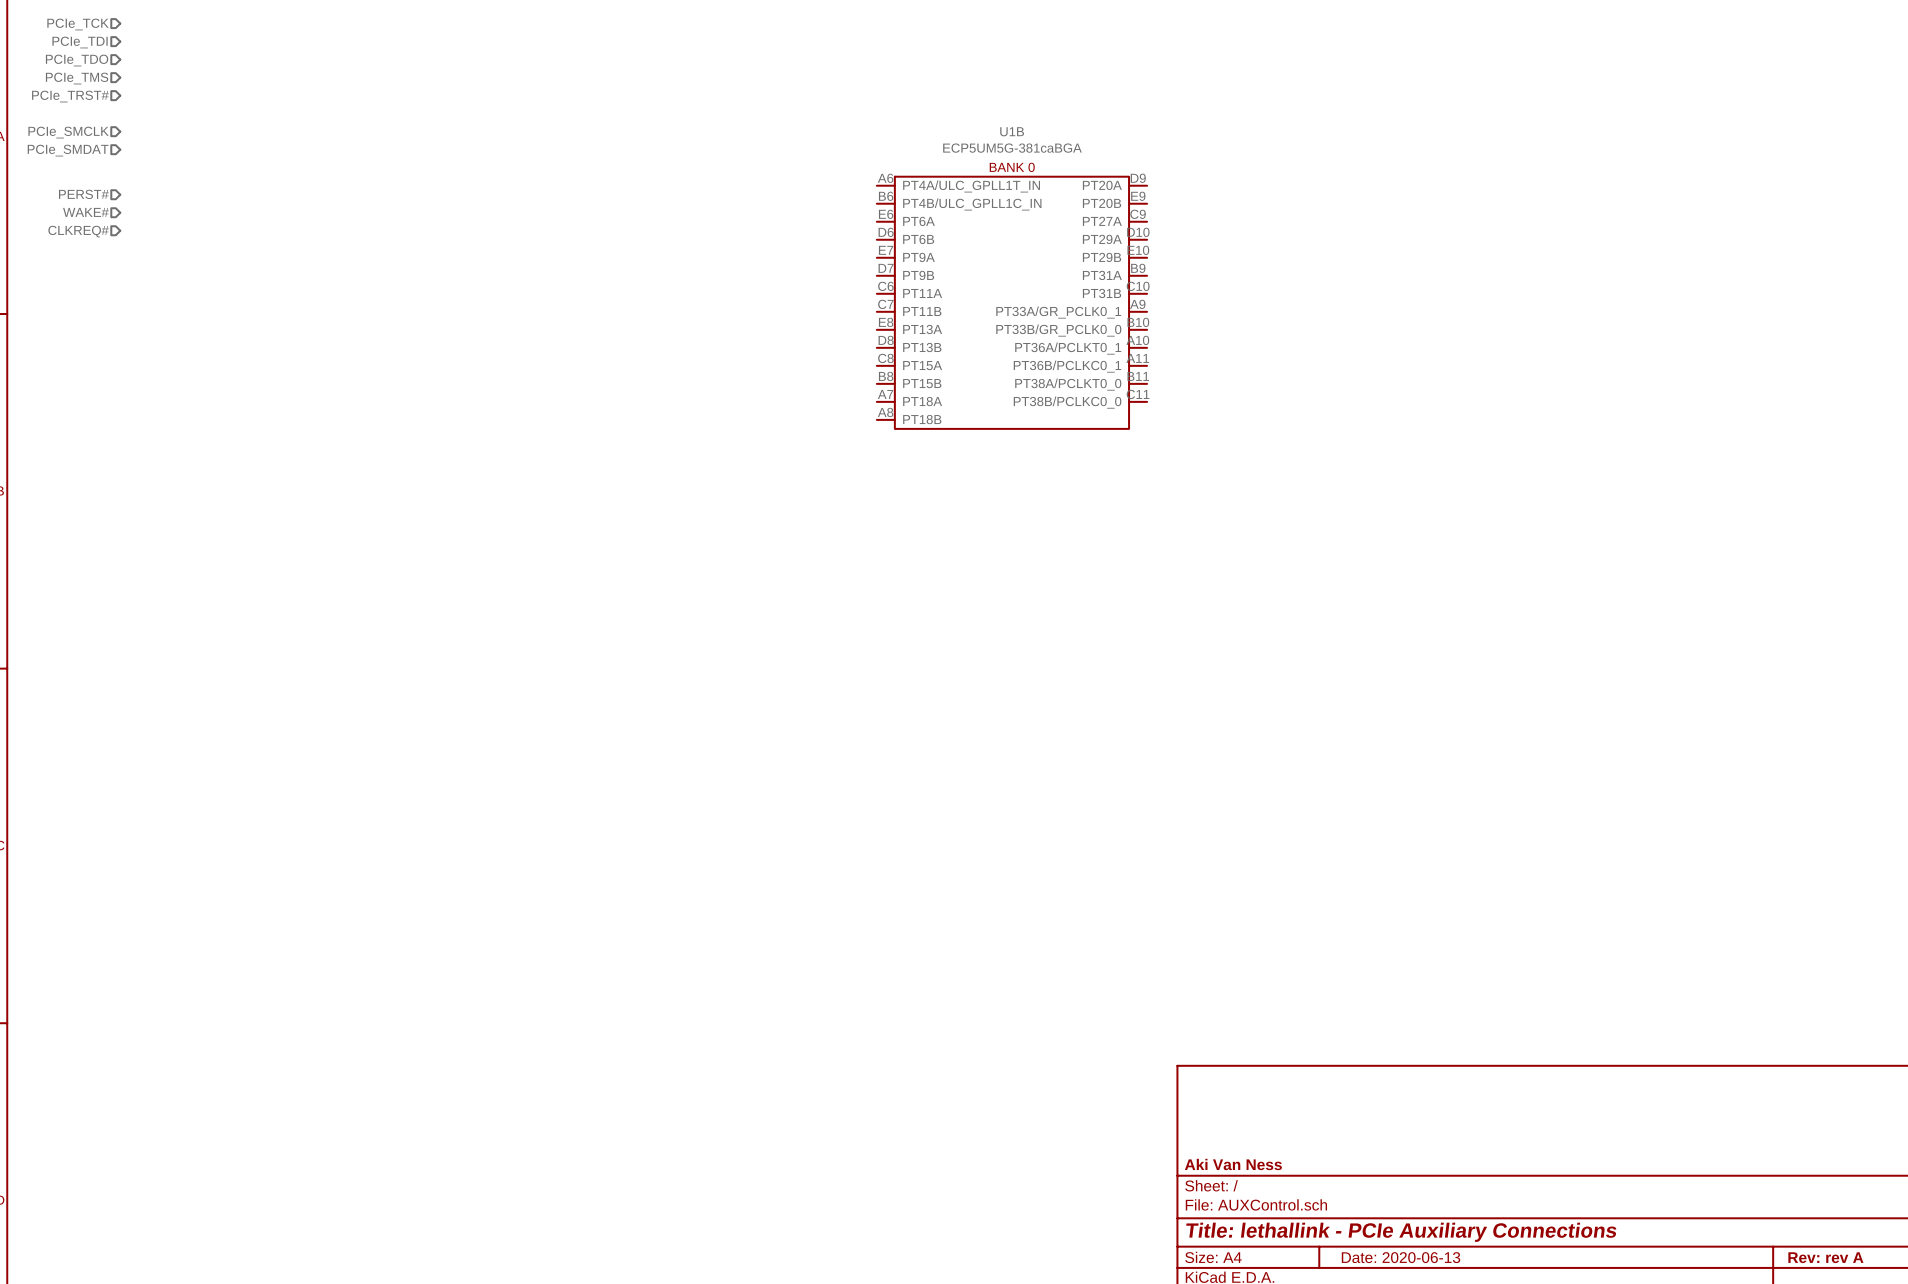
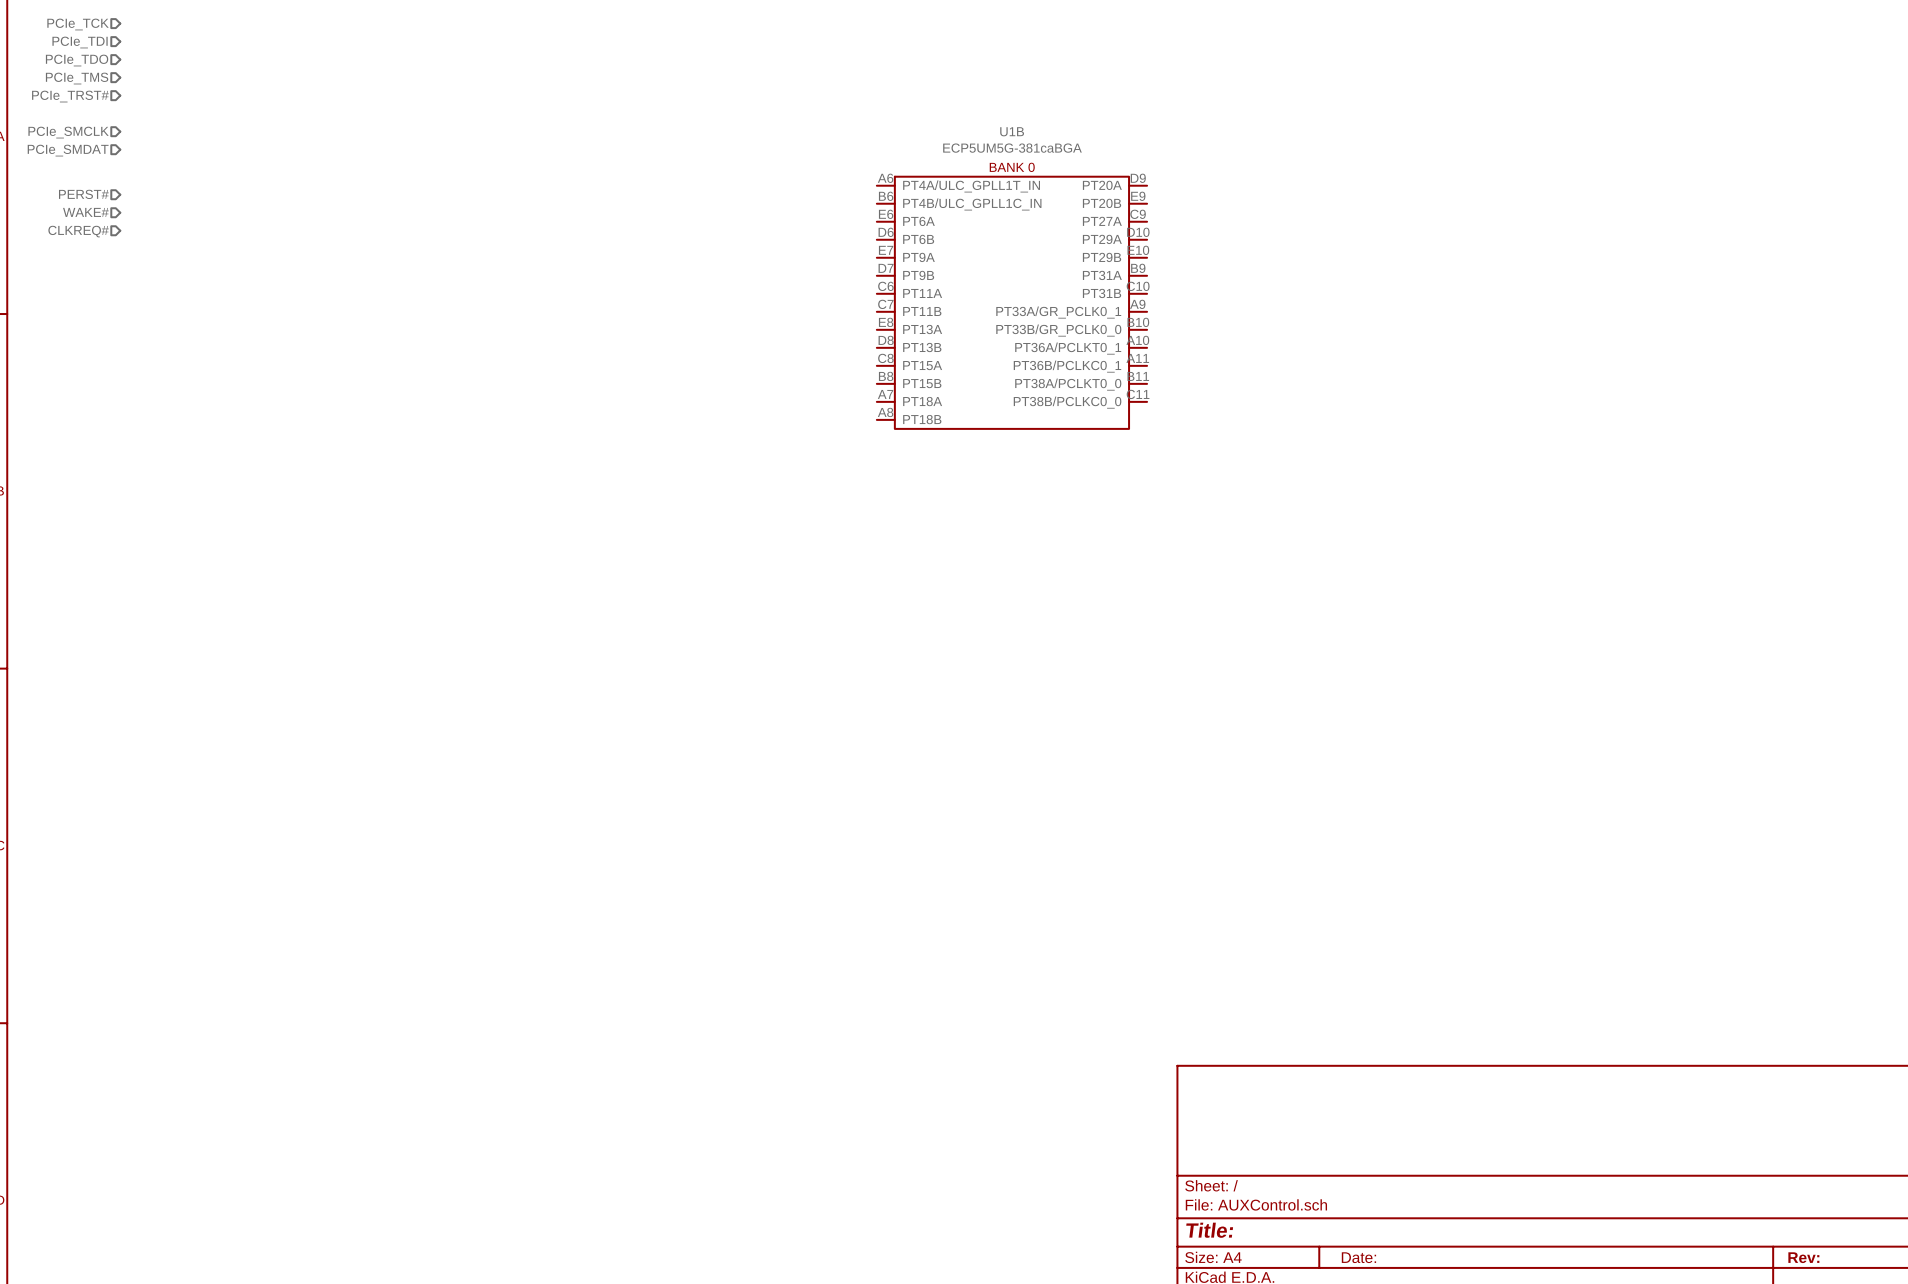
title block: Aki Van Ness (1233, 1164) -> none
title block: Title: lethallink - PCIe Auxiliary Connections (1401, 1232) -> Title: (1209, 1230)
title block: Date: 2020-06-13 (1401, 1257) -> Date: (1358, 1257)
title block: Rev: rev A (1825, 1257) -> Rev: (1803, 1257)

